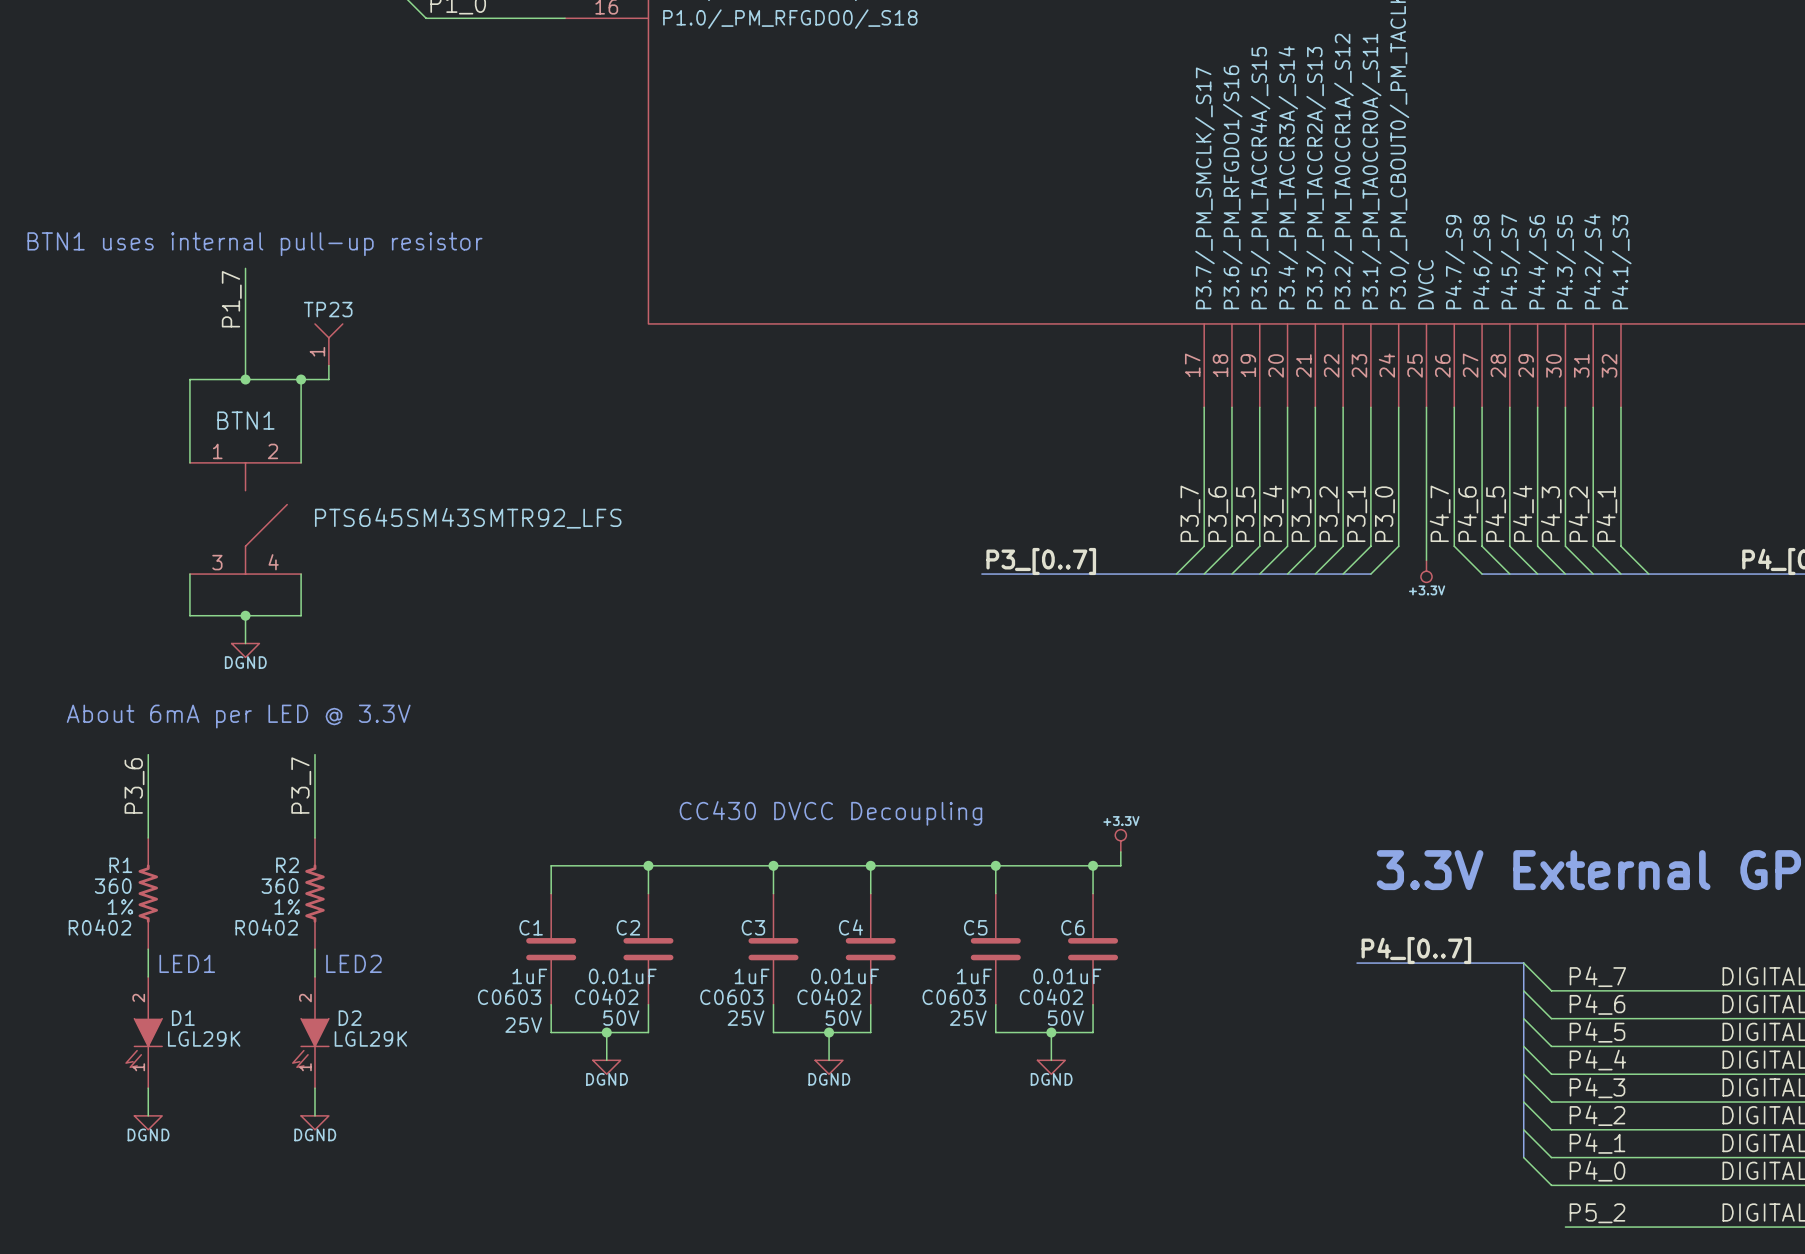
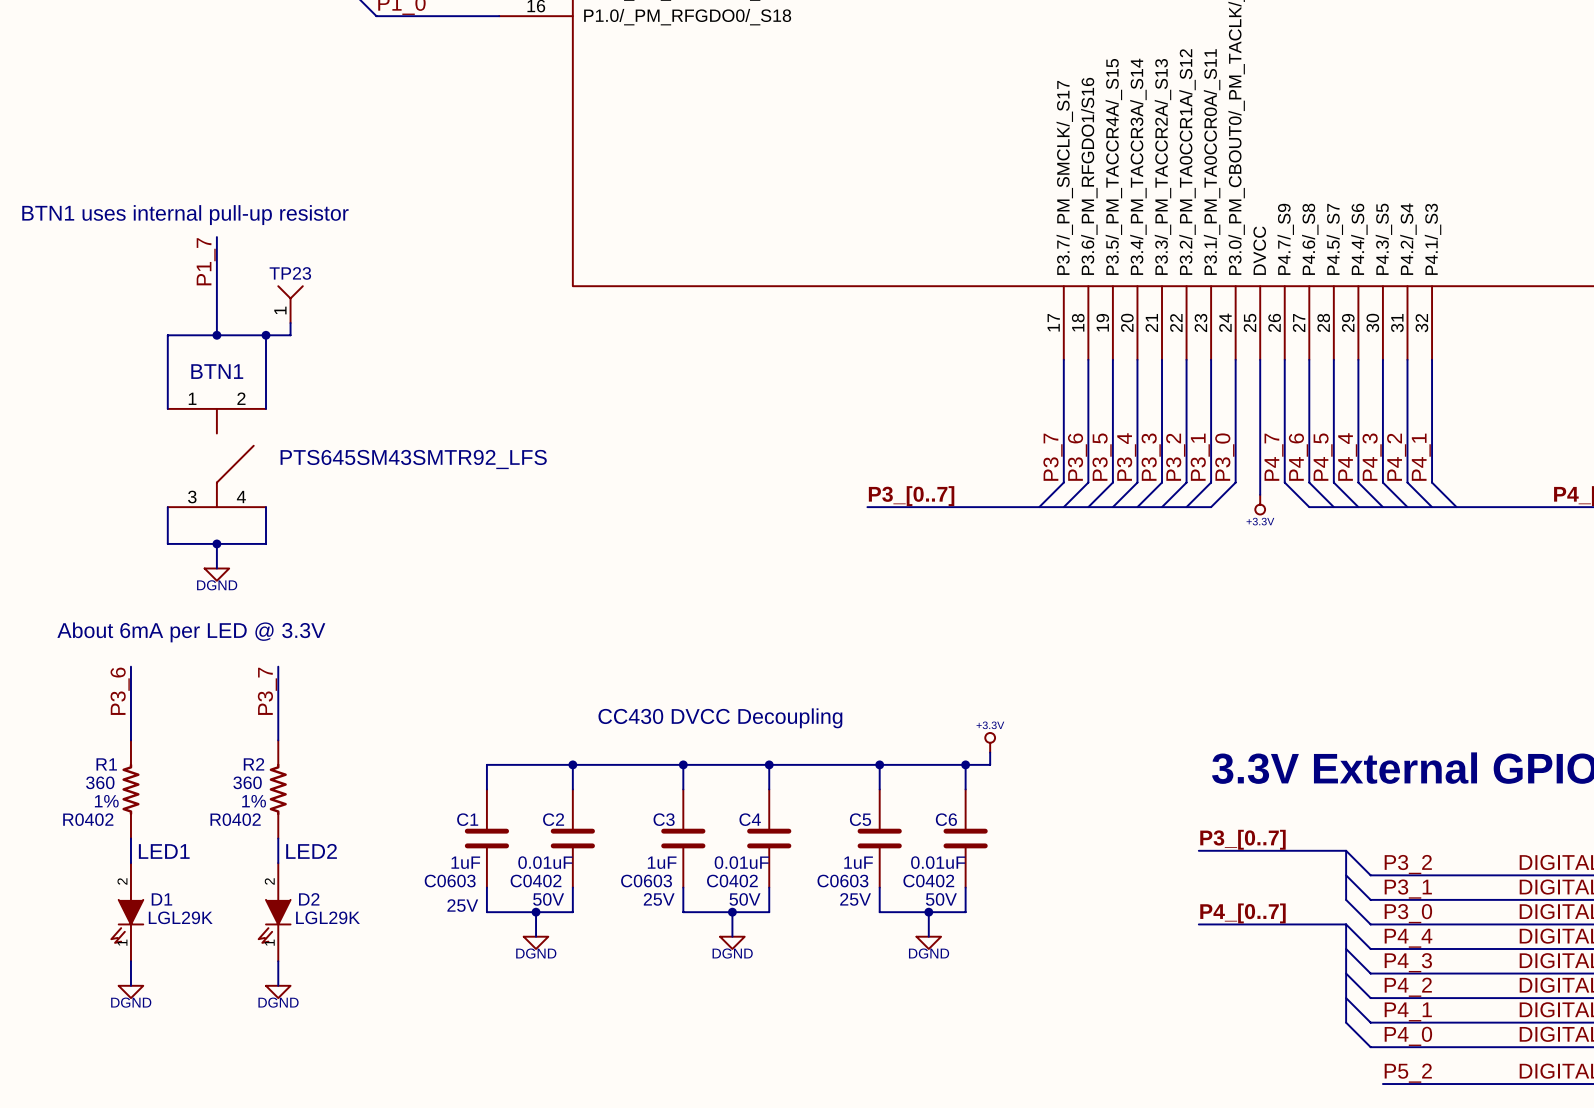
label: P4_[0..7] (1416, 950) -> P3_[0..7] (1242, 839)
label: P4_7 (1597, 976) -> P3_2 (1408, 864)
label: P4_6 (1597, 1004) -> P3_1 (1408, 889)
bus: (1523, 1018) (1523, 1046) -> (1198, 924) (1346, 924)
label: P4_5 (1597, 1032) -> P3_0 (1408, 913)
label: none -> P4_[0..7] (1242, 913)

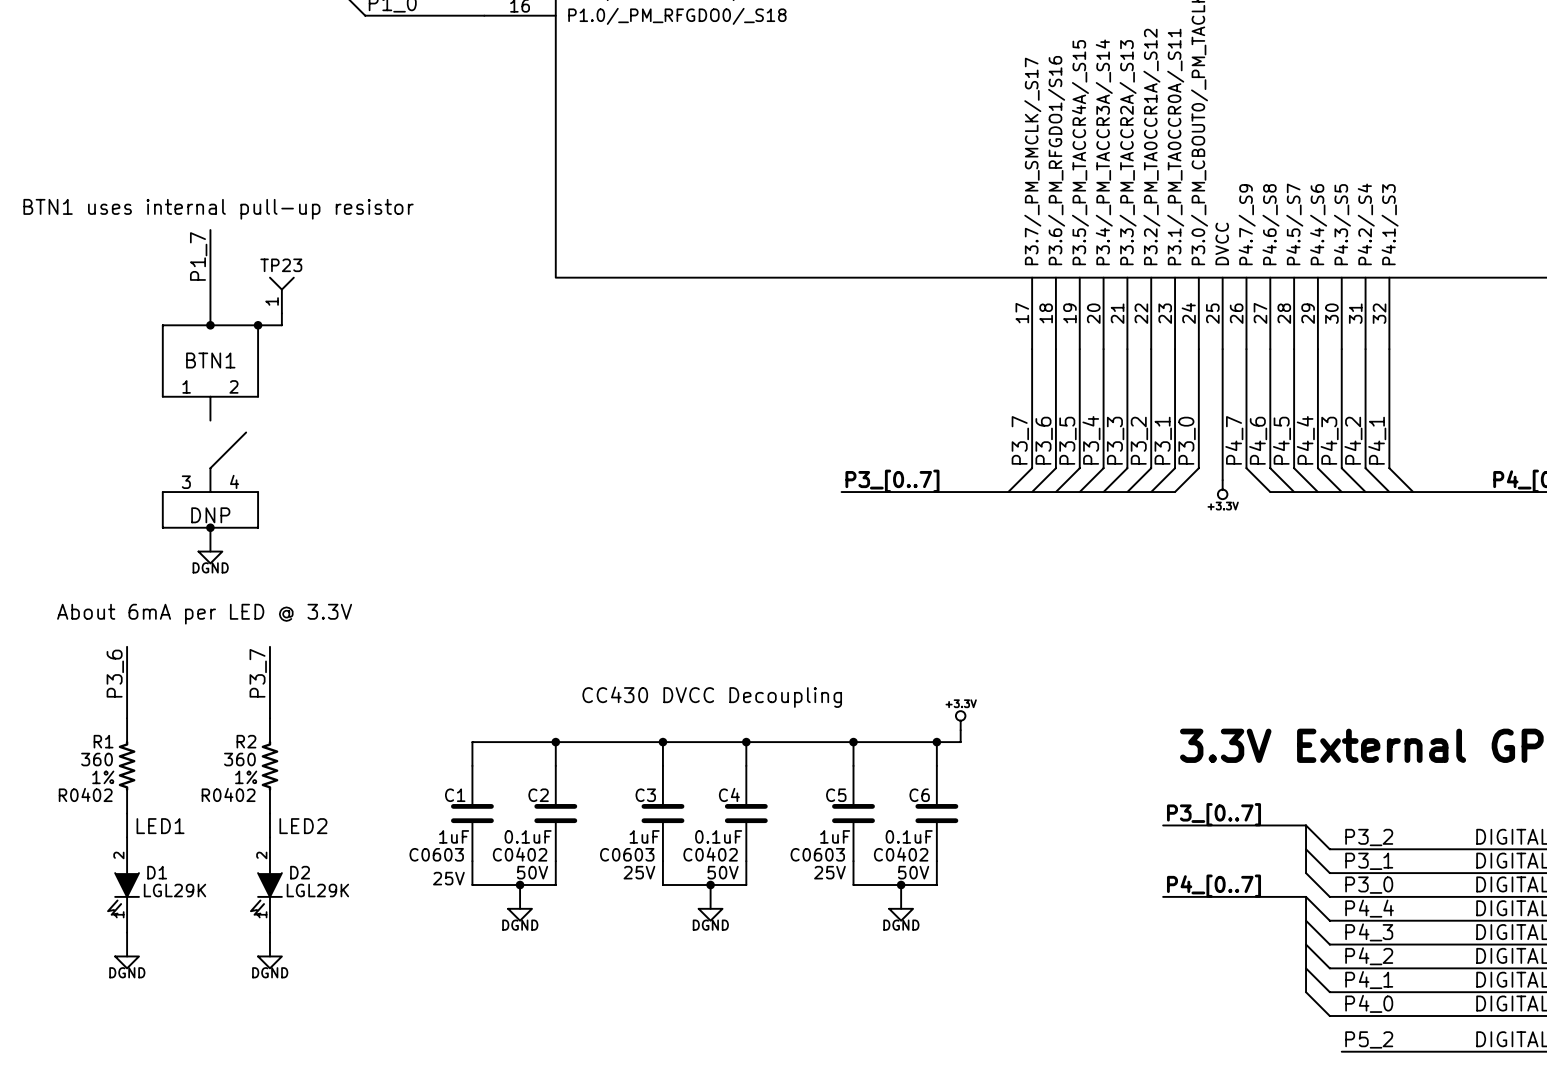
BTN1 value: PTS645SM43SMTR92_LFS (413, 459) -> DNP (210, 515)
C2 value: 0.01uF (545, 862) -> 0.1uF (528, 836)
C4 value: 0.01uF (741, 862) -> 0.1uF (718, 836)
C6 value: 0.01uF (938, 862) -> 0.1uF (909, 836)

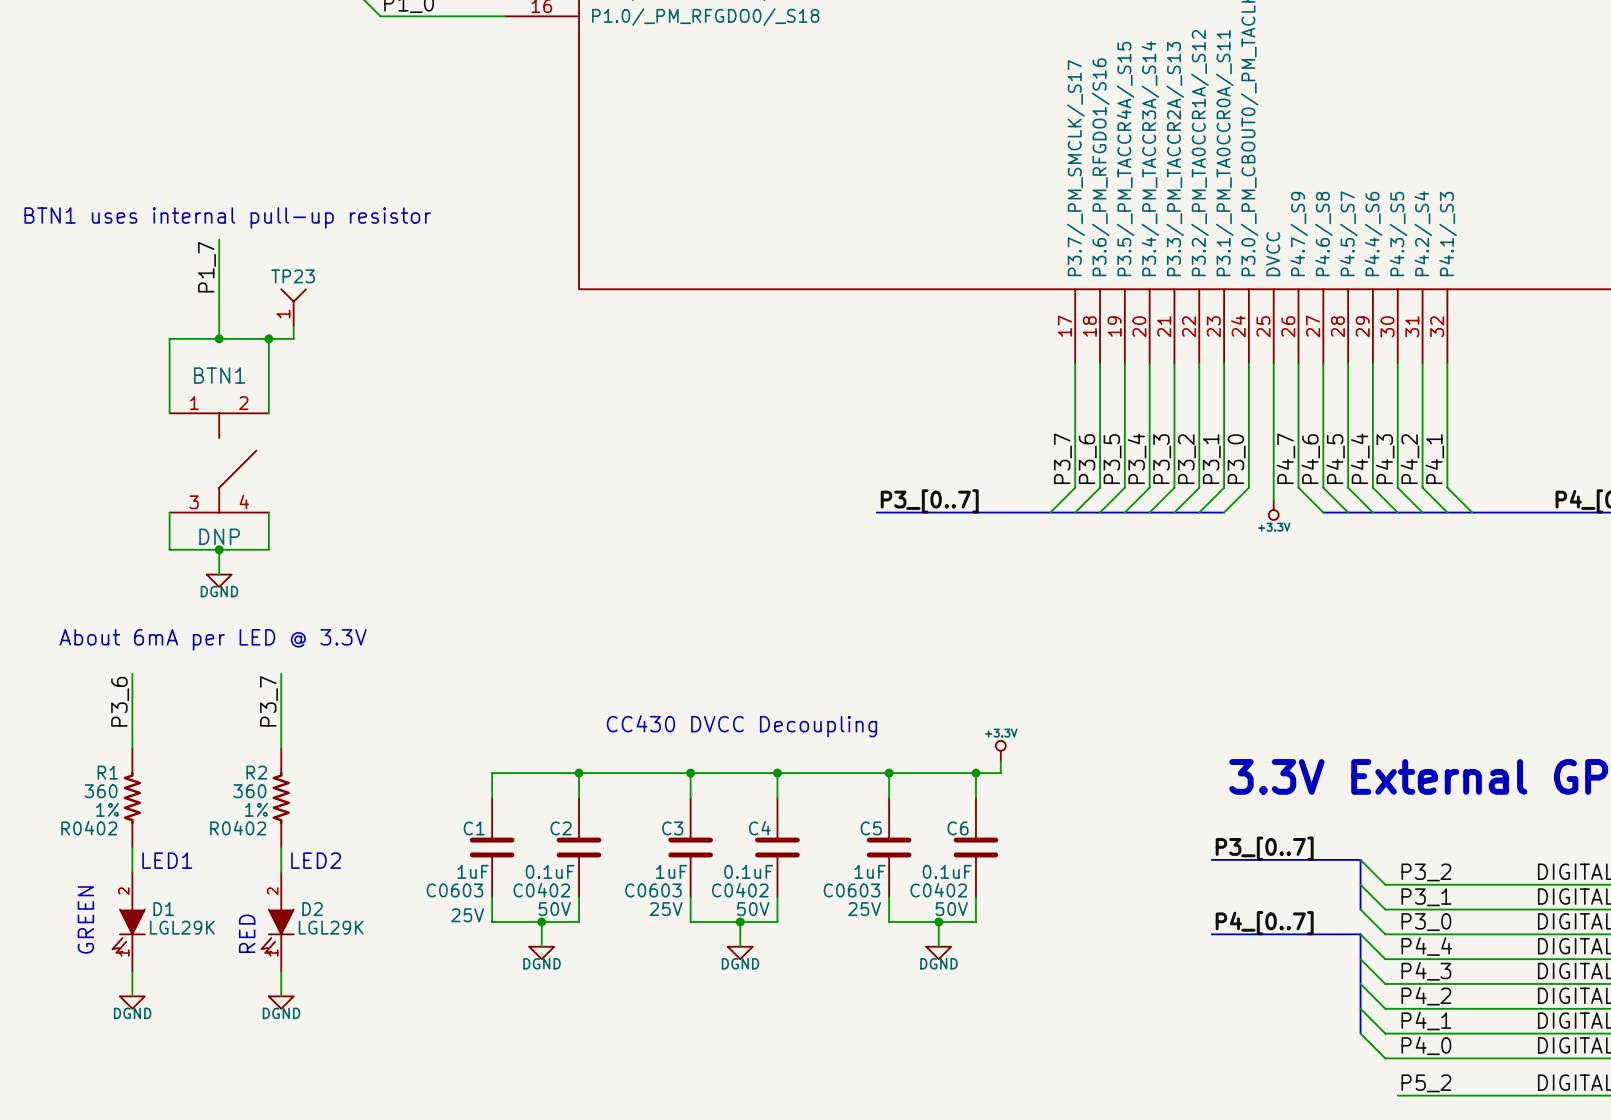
text: none -> GREEN (85, 919)
text: none -> RED (247, 933)

